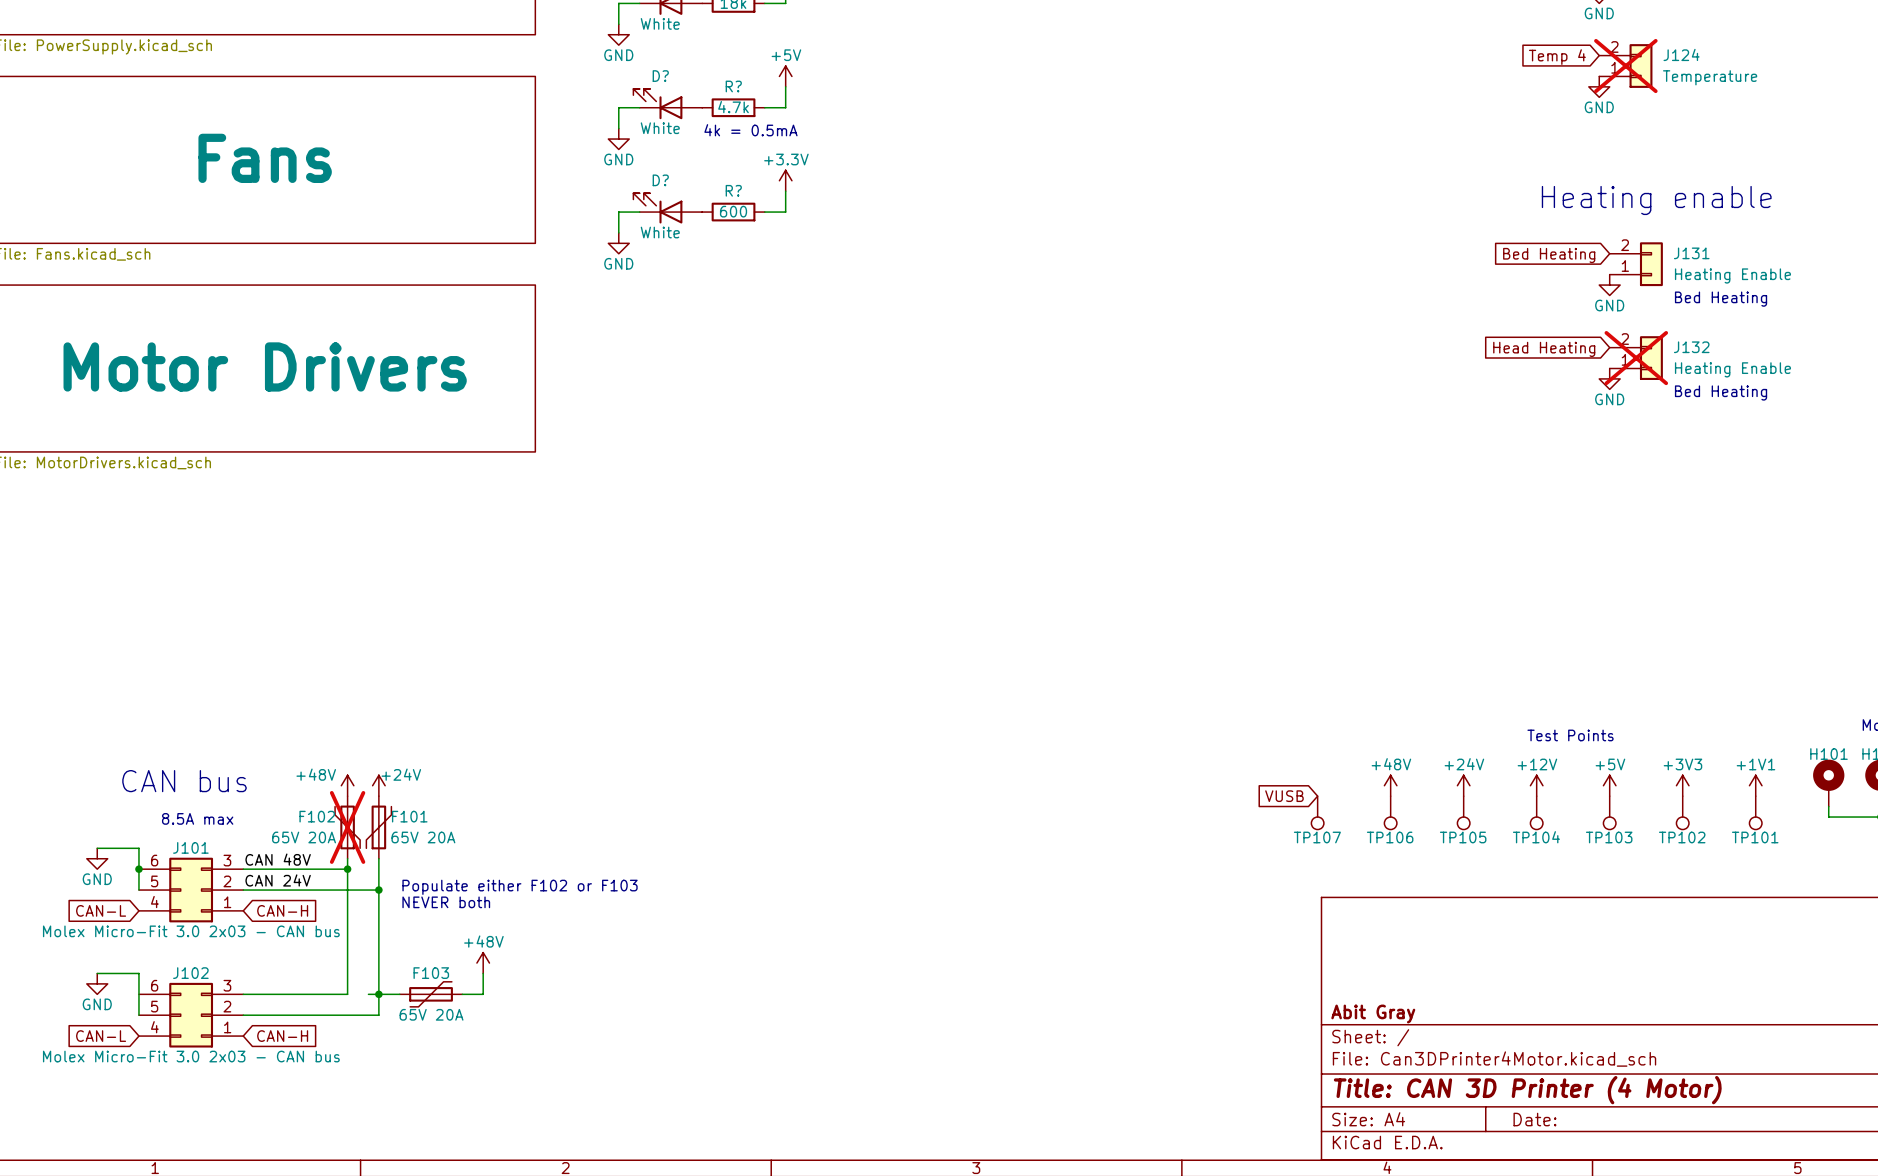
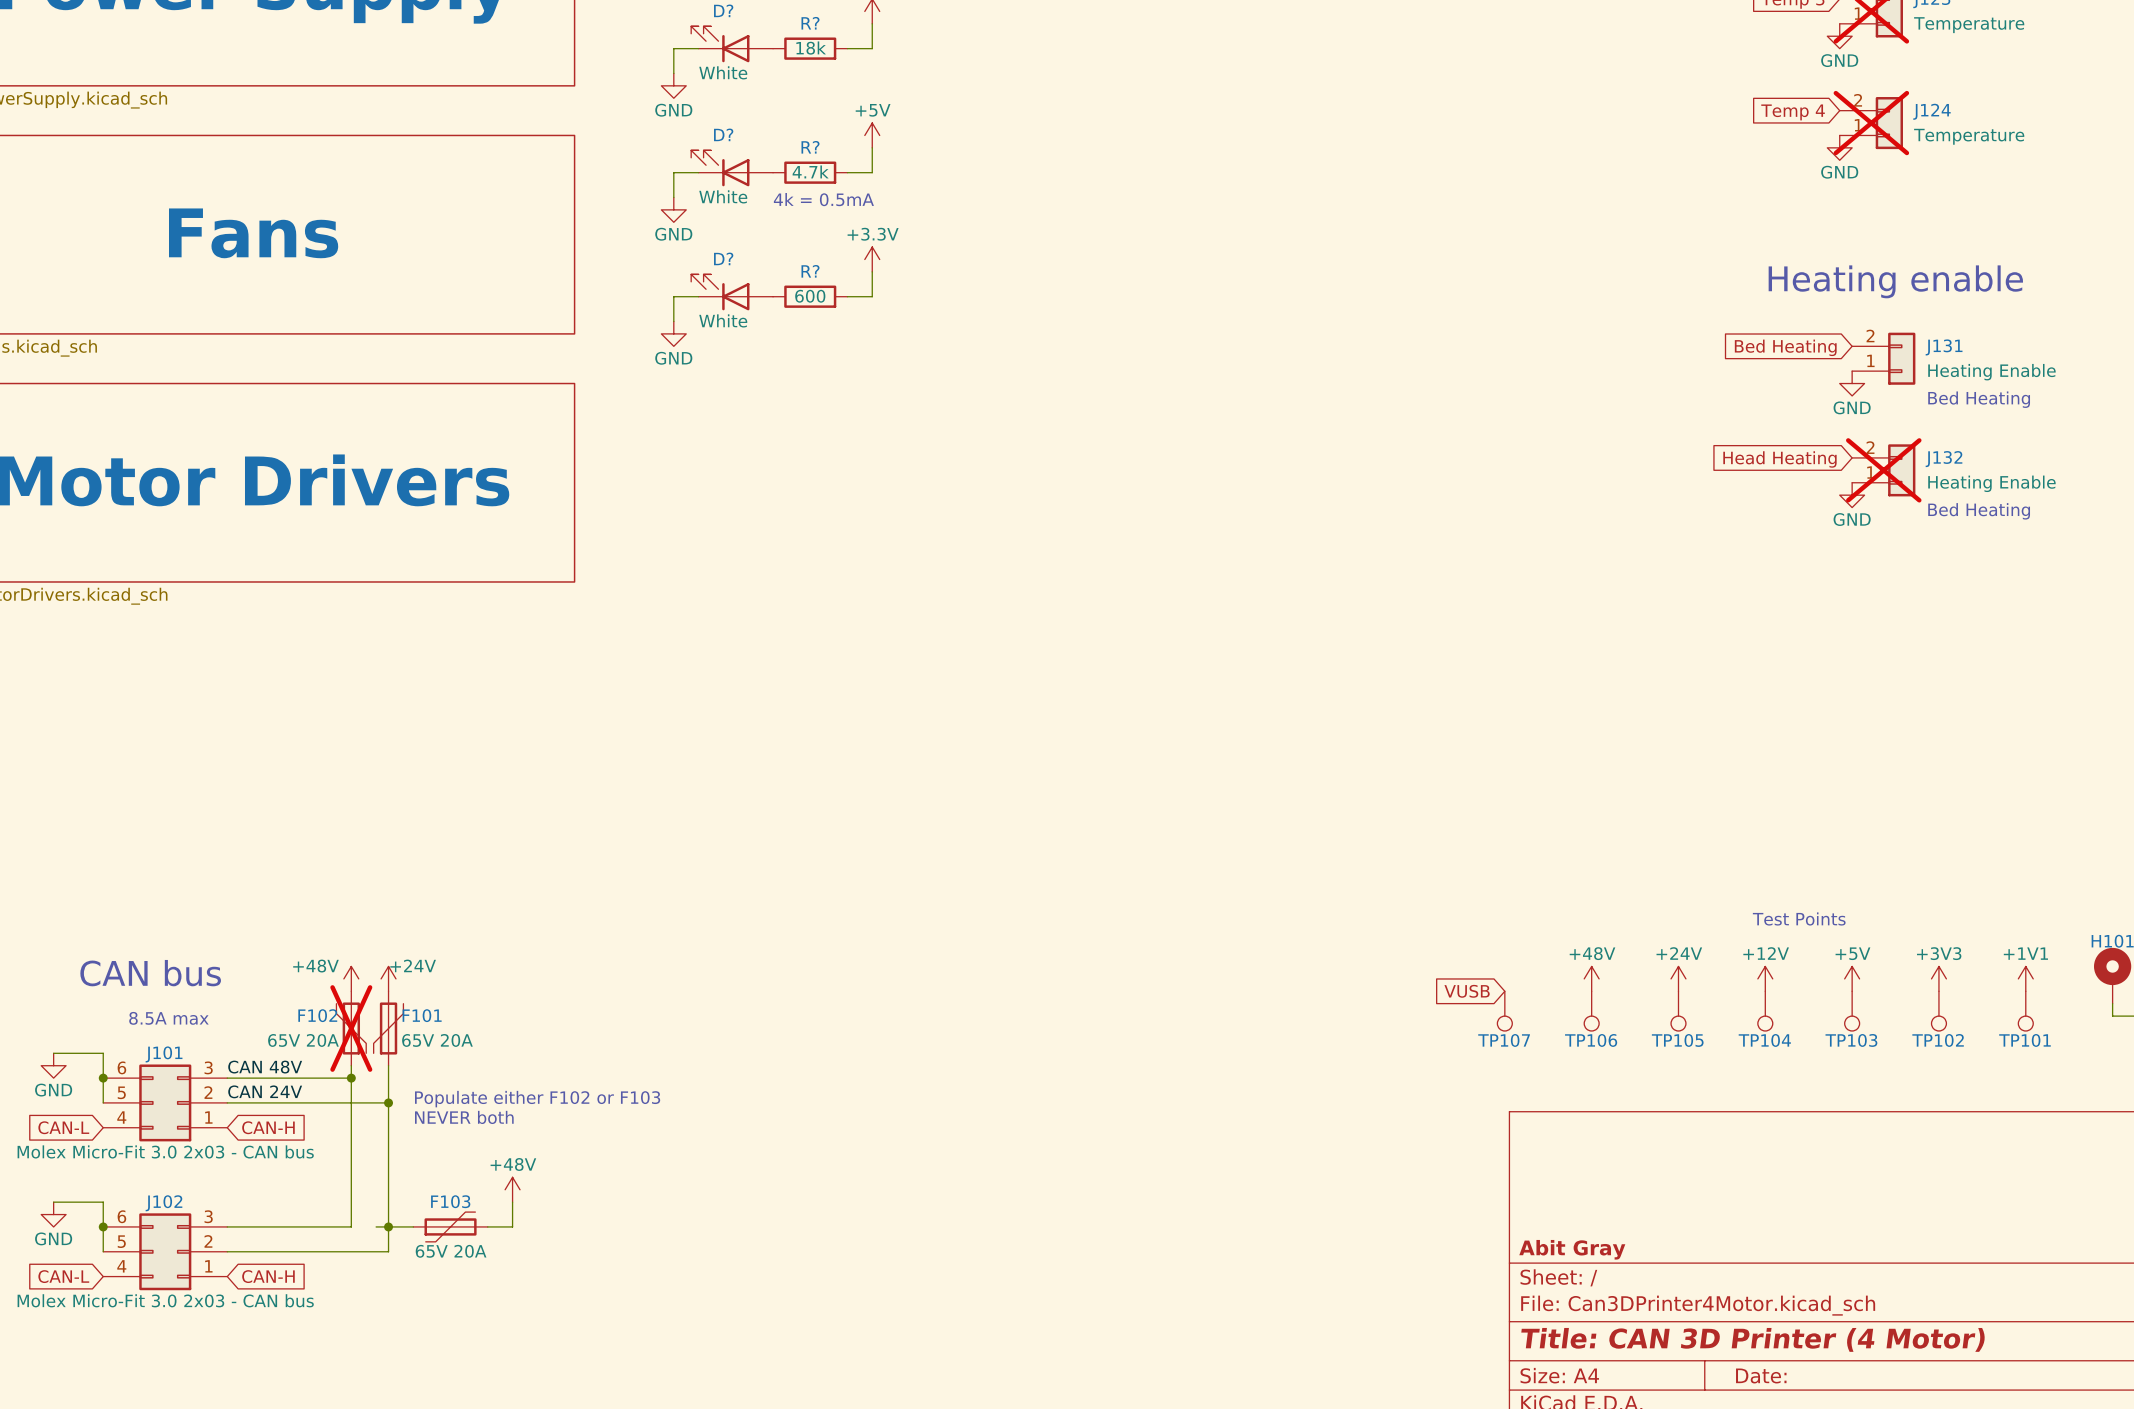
junction: none -> (103, 1226)

